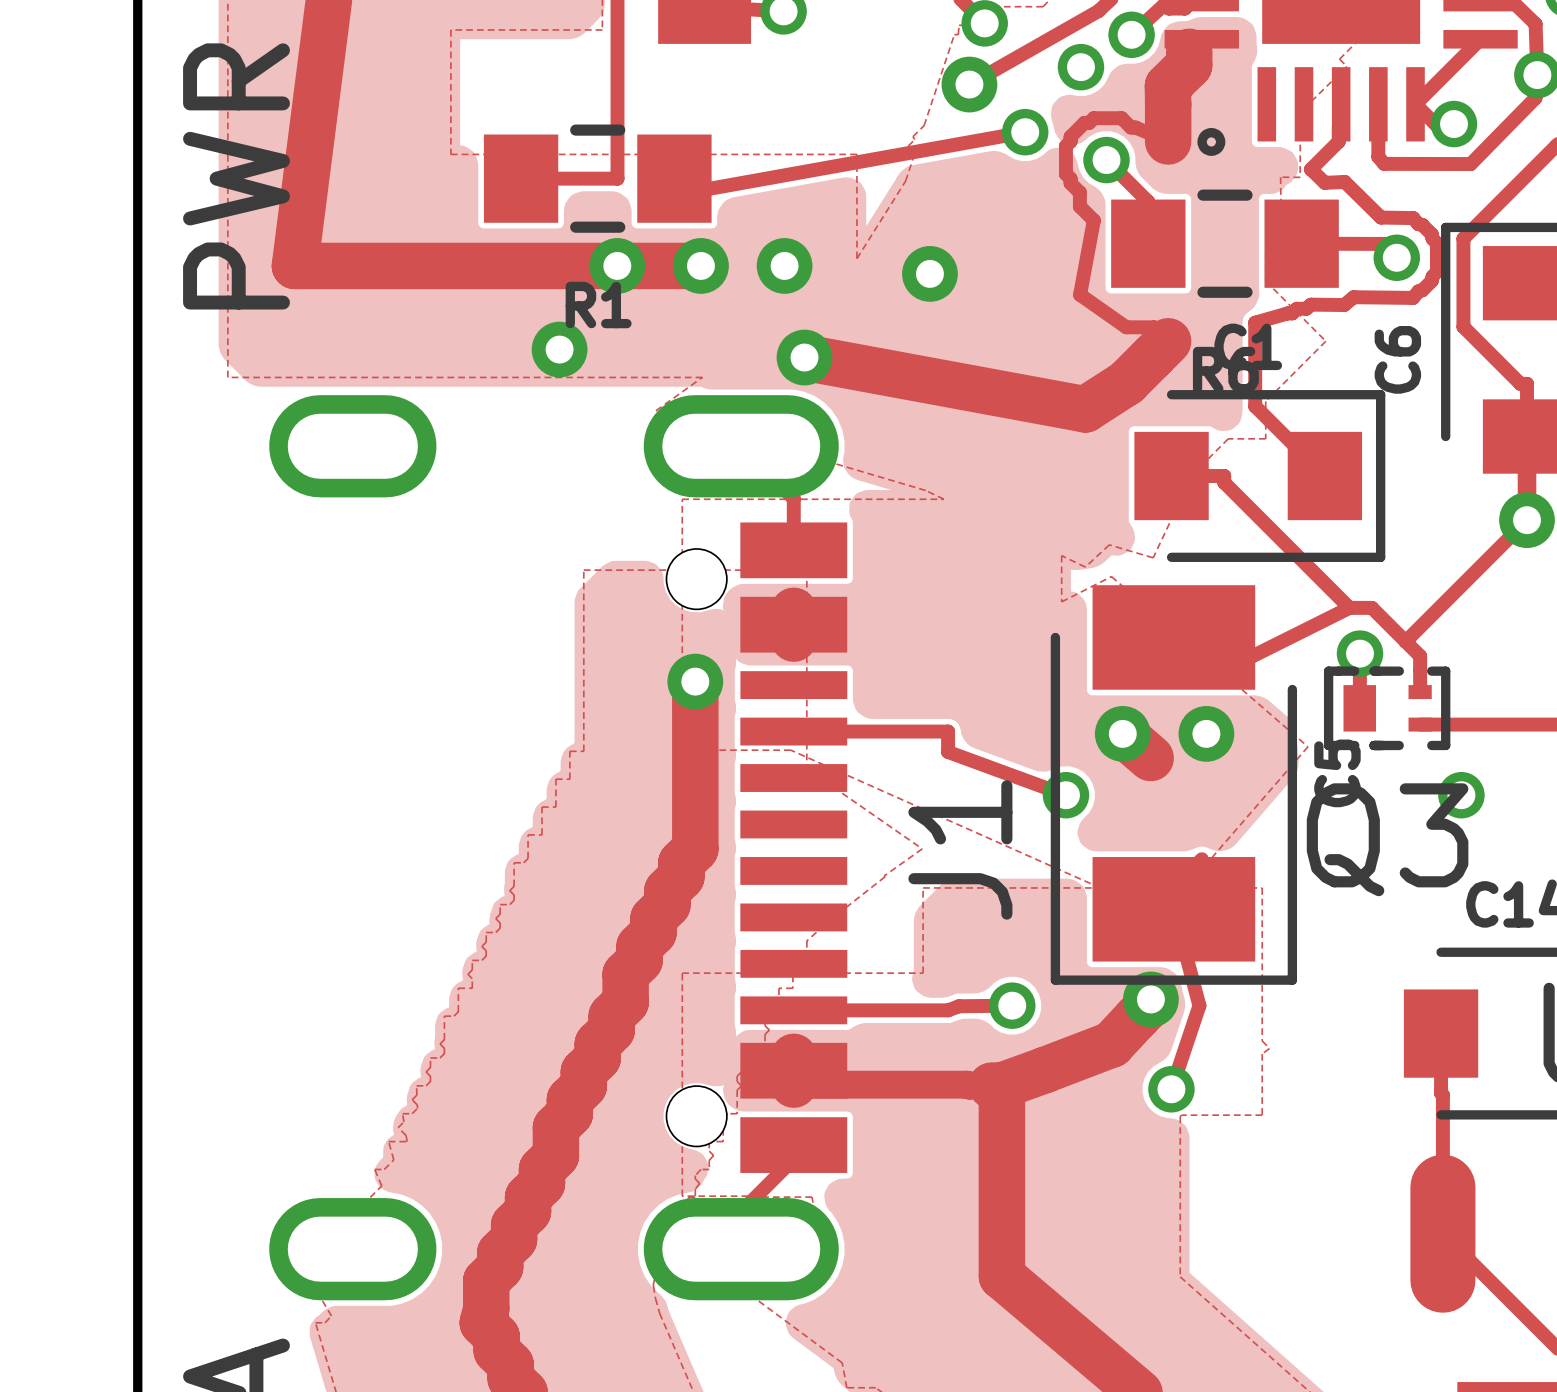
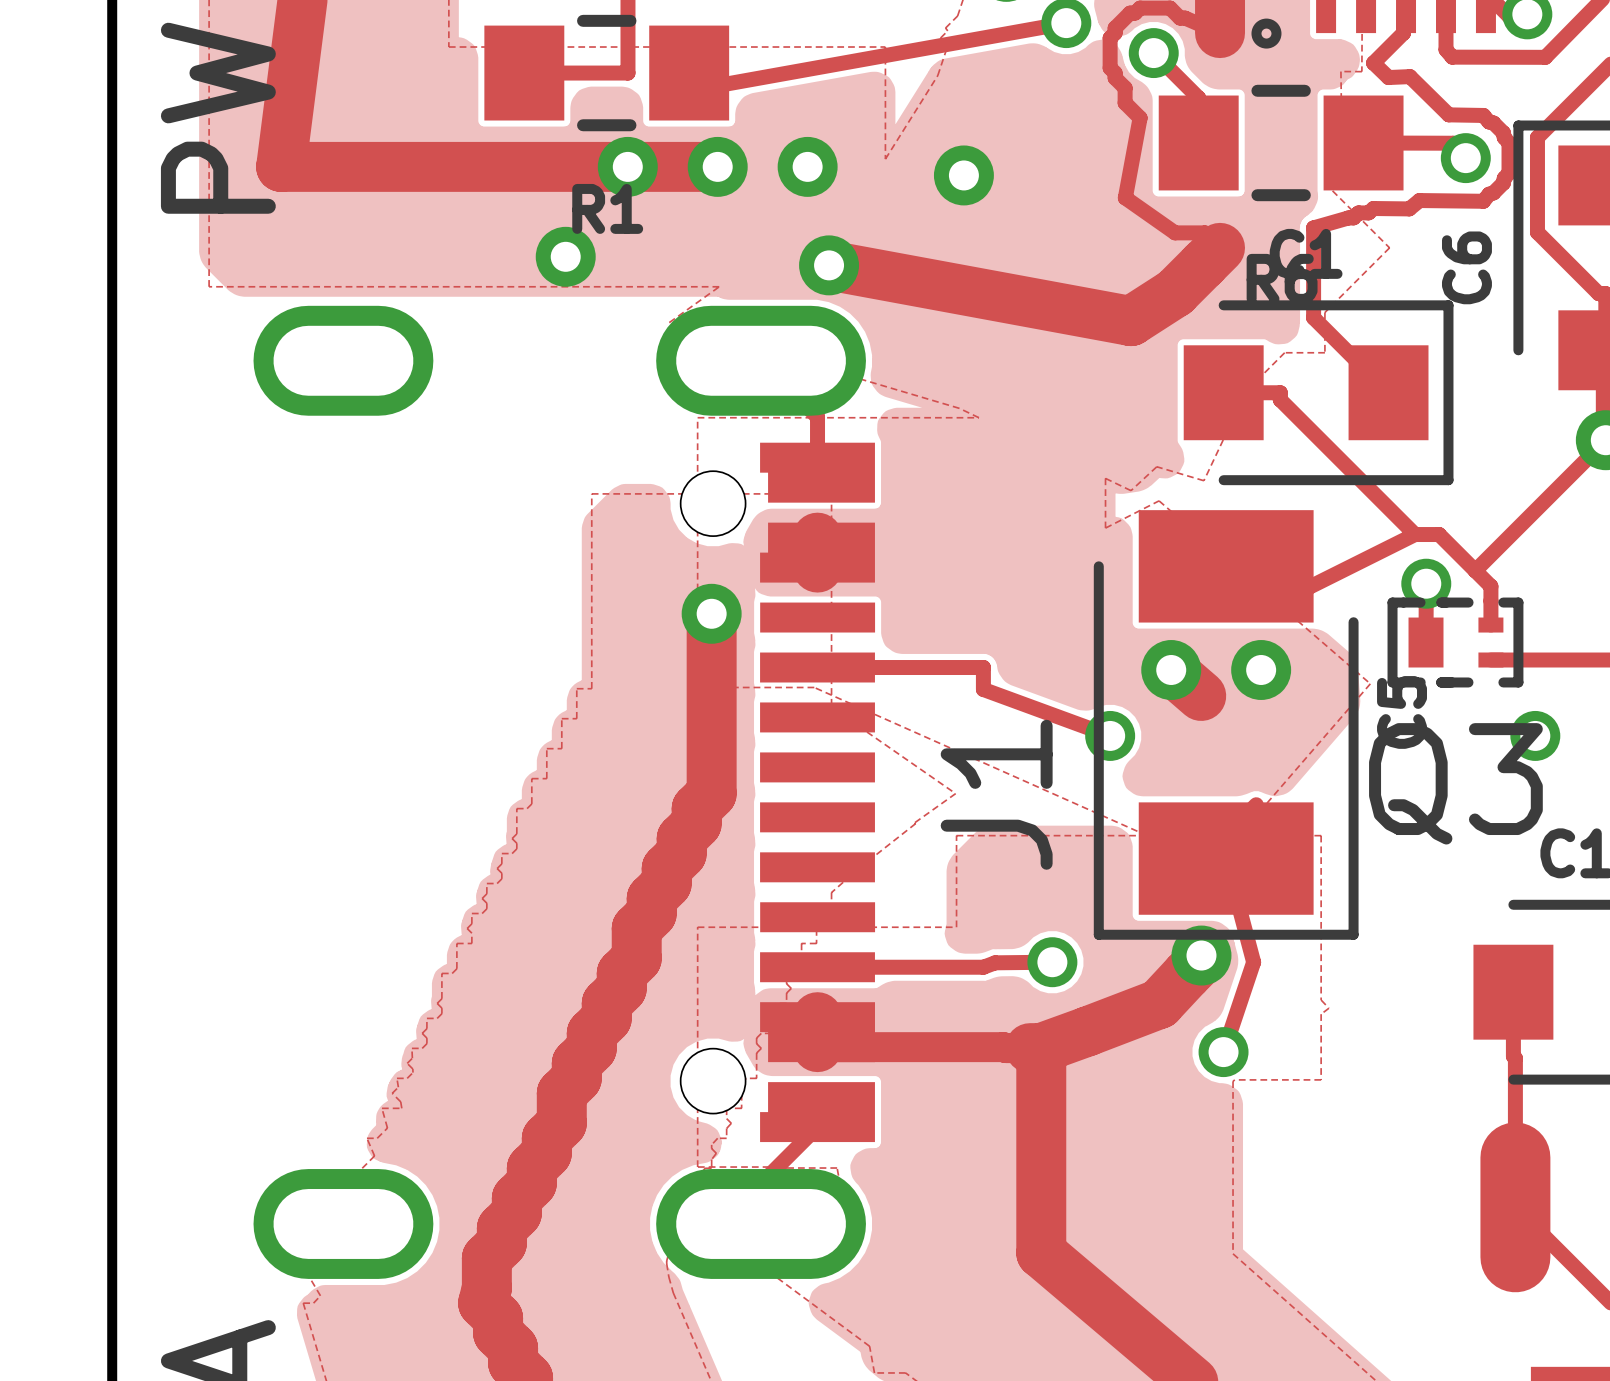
J1 footprint: [269, 395, 848, 1301] -> [253, 305, 876, 1279]

